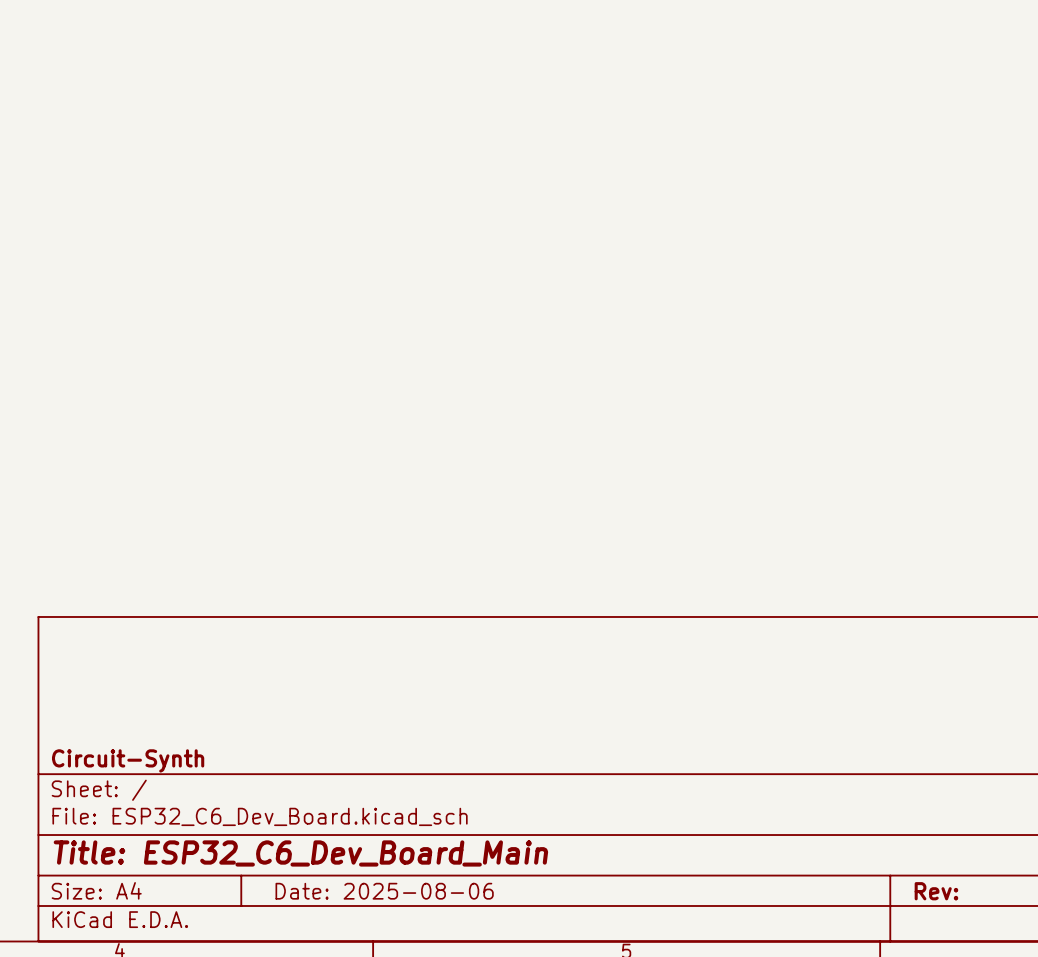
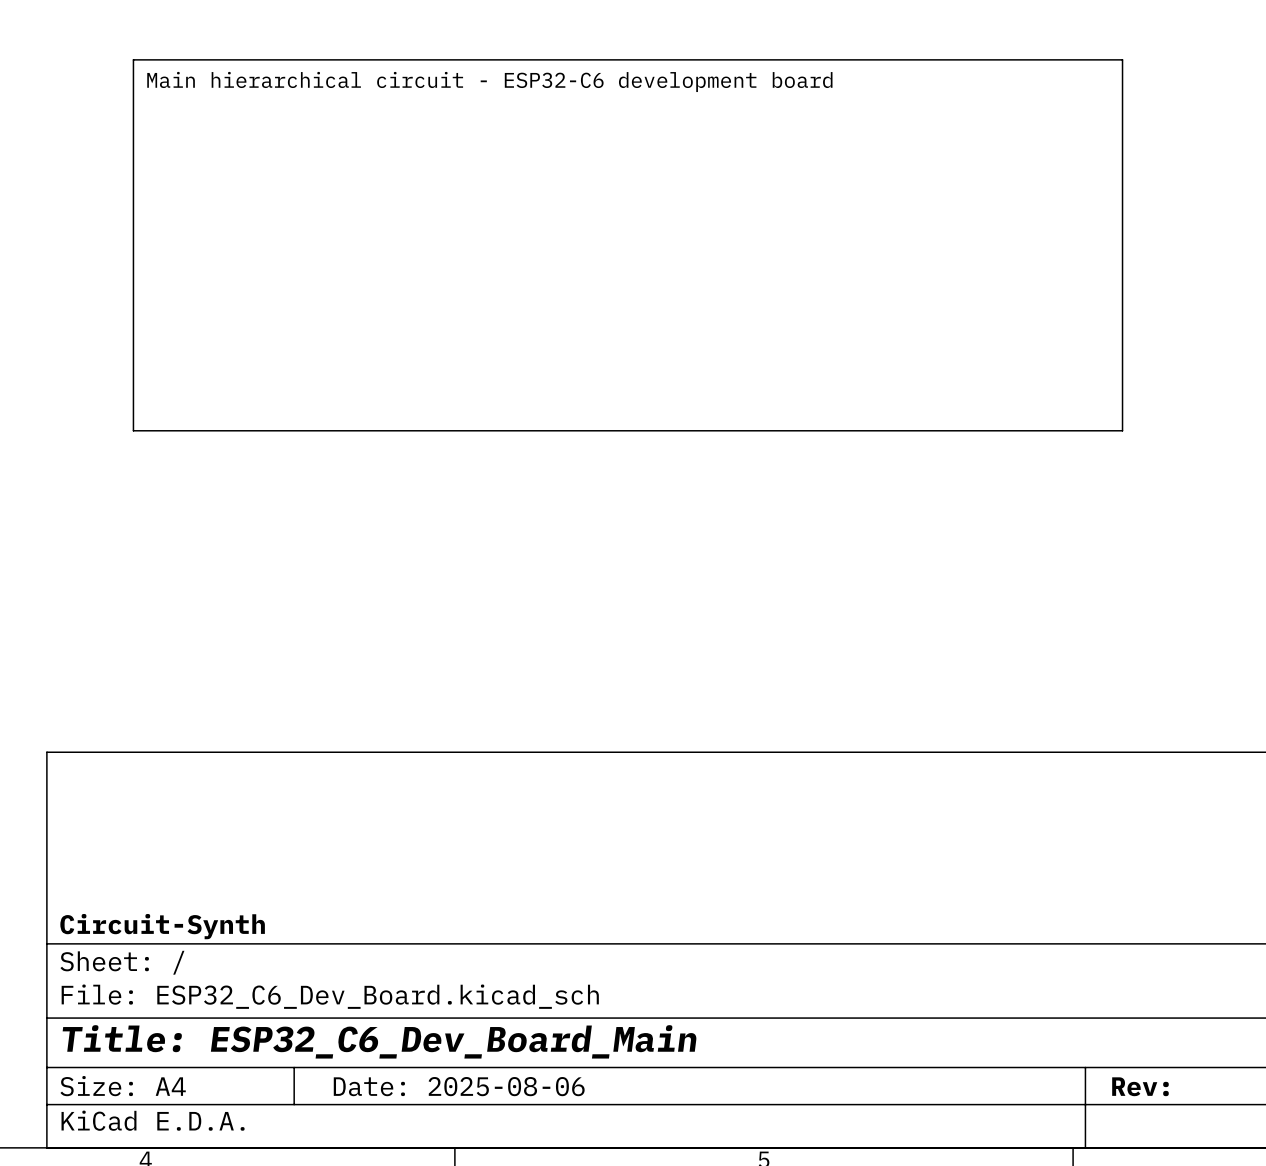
line: none -> (133, 59) (1122, 59) (1122, 430) (133, 430) (133, 59)
text: none -> Main hierarchical circuit - ESP32-C6 development board (489, 81)

